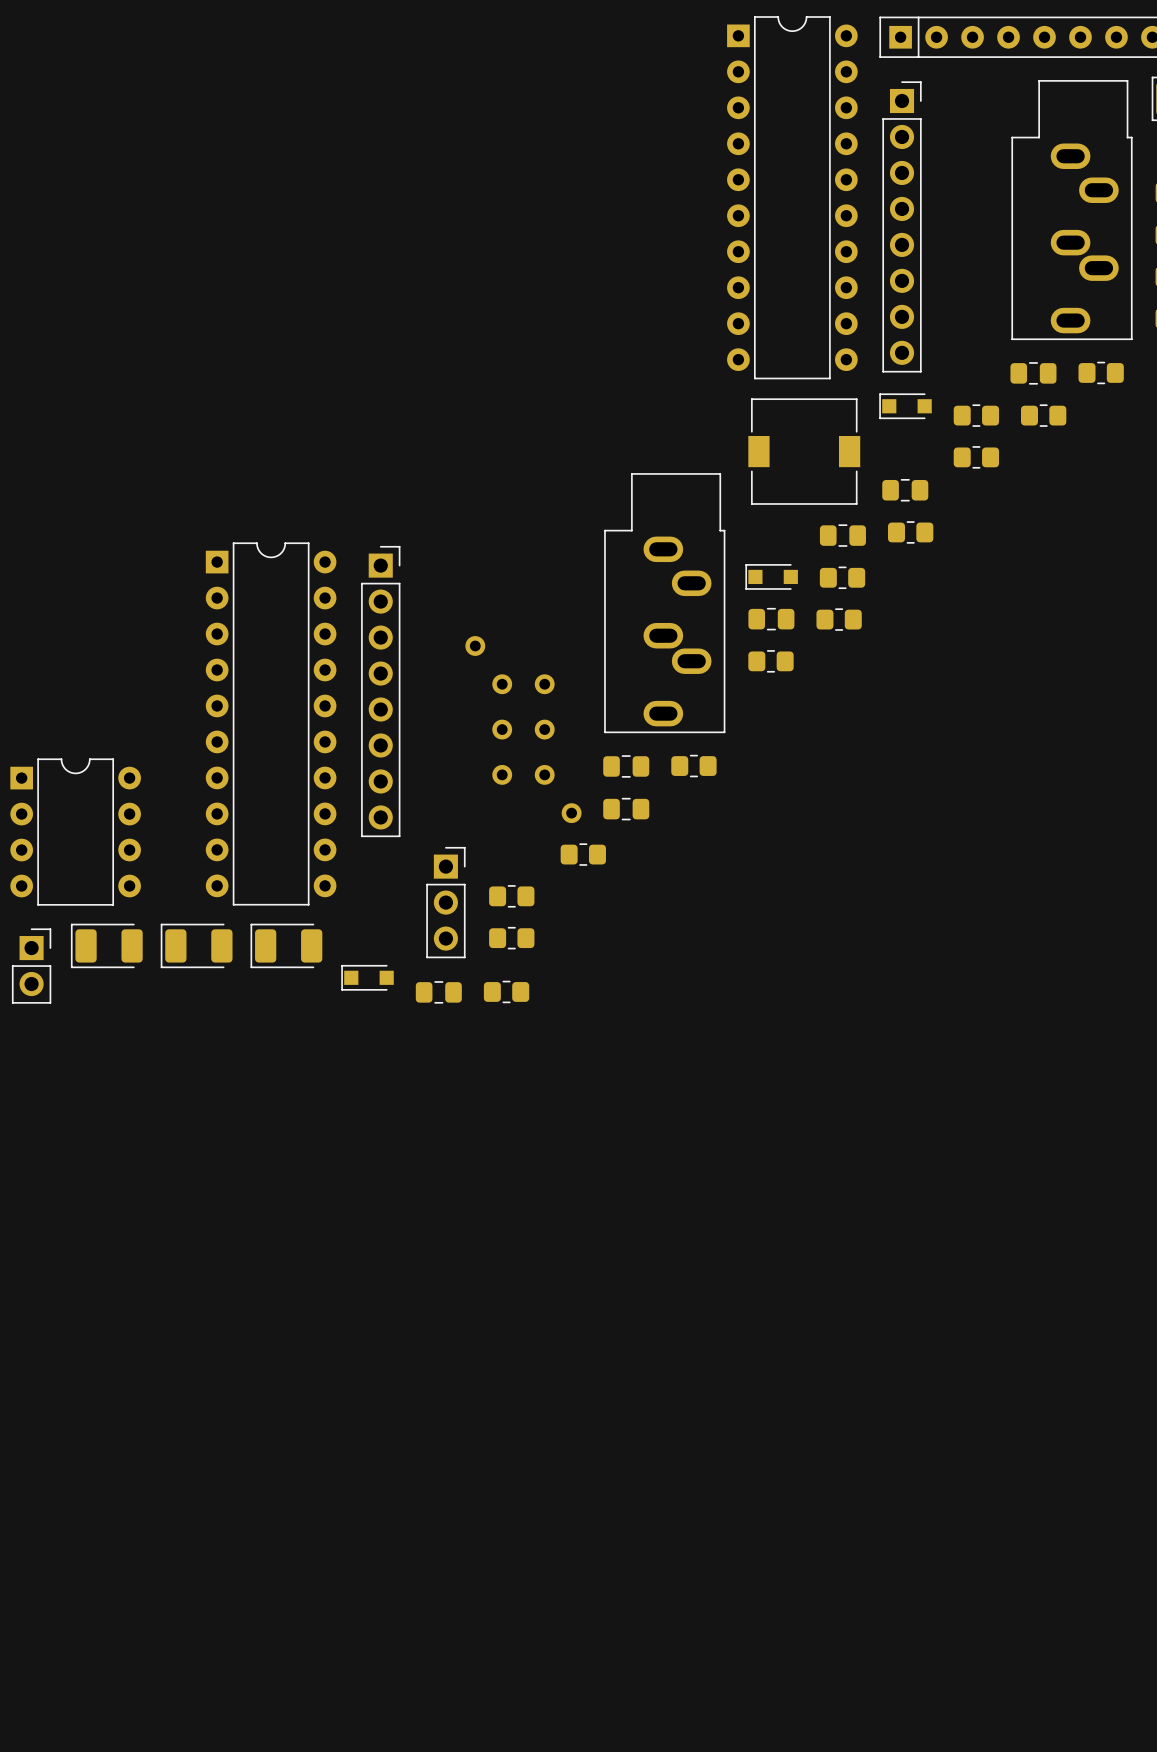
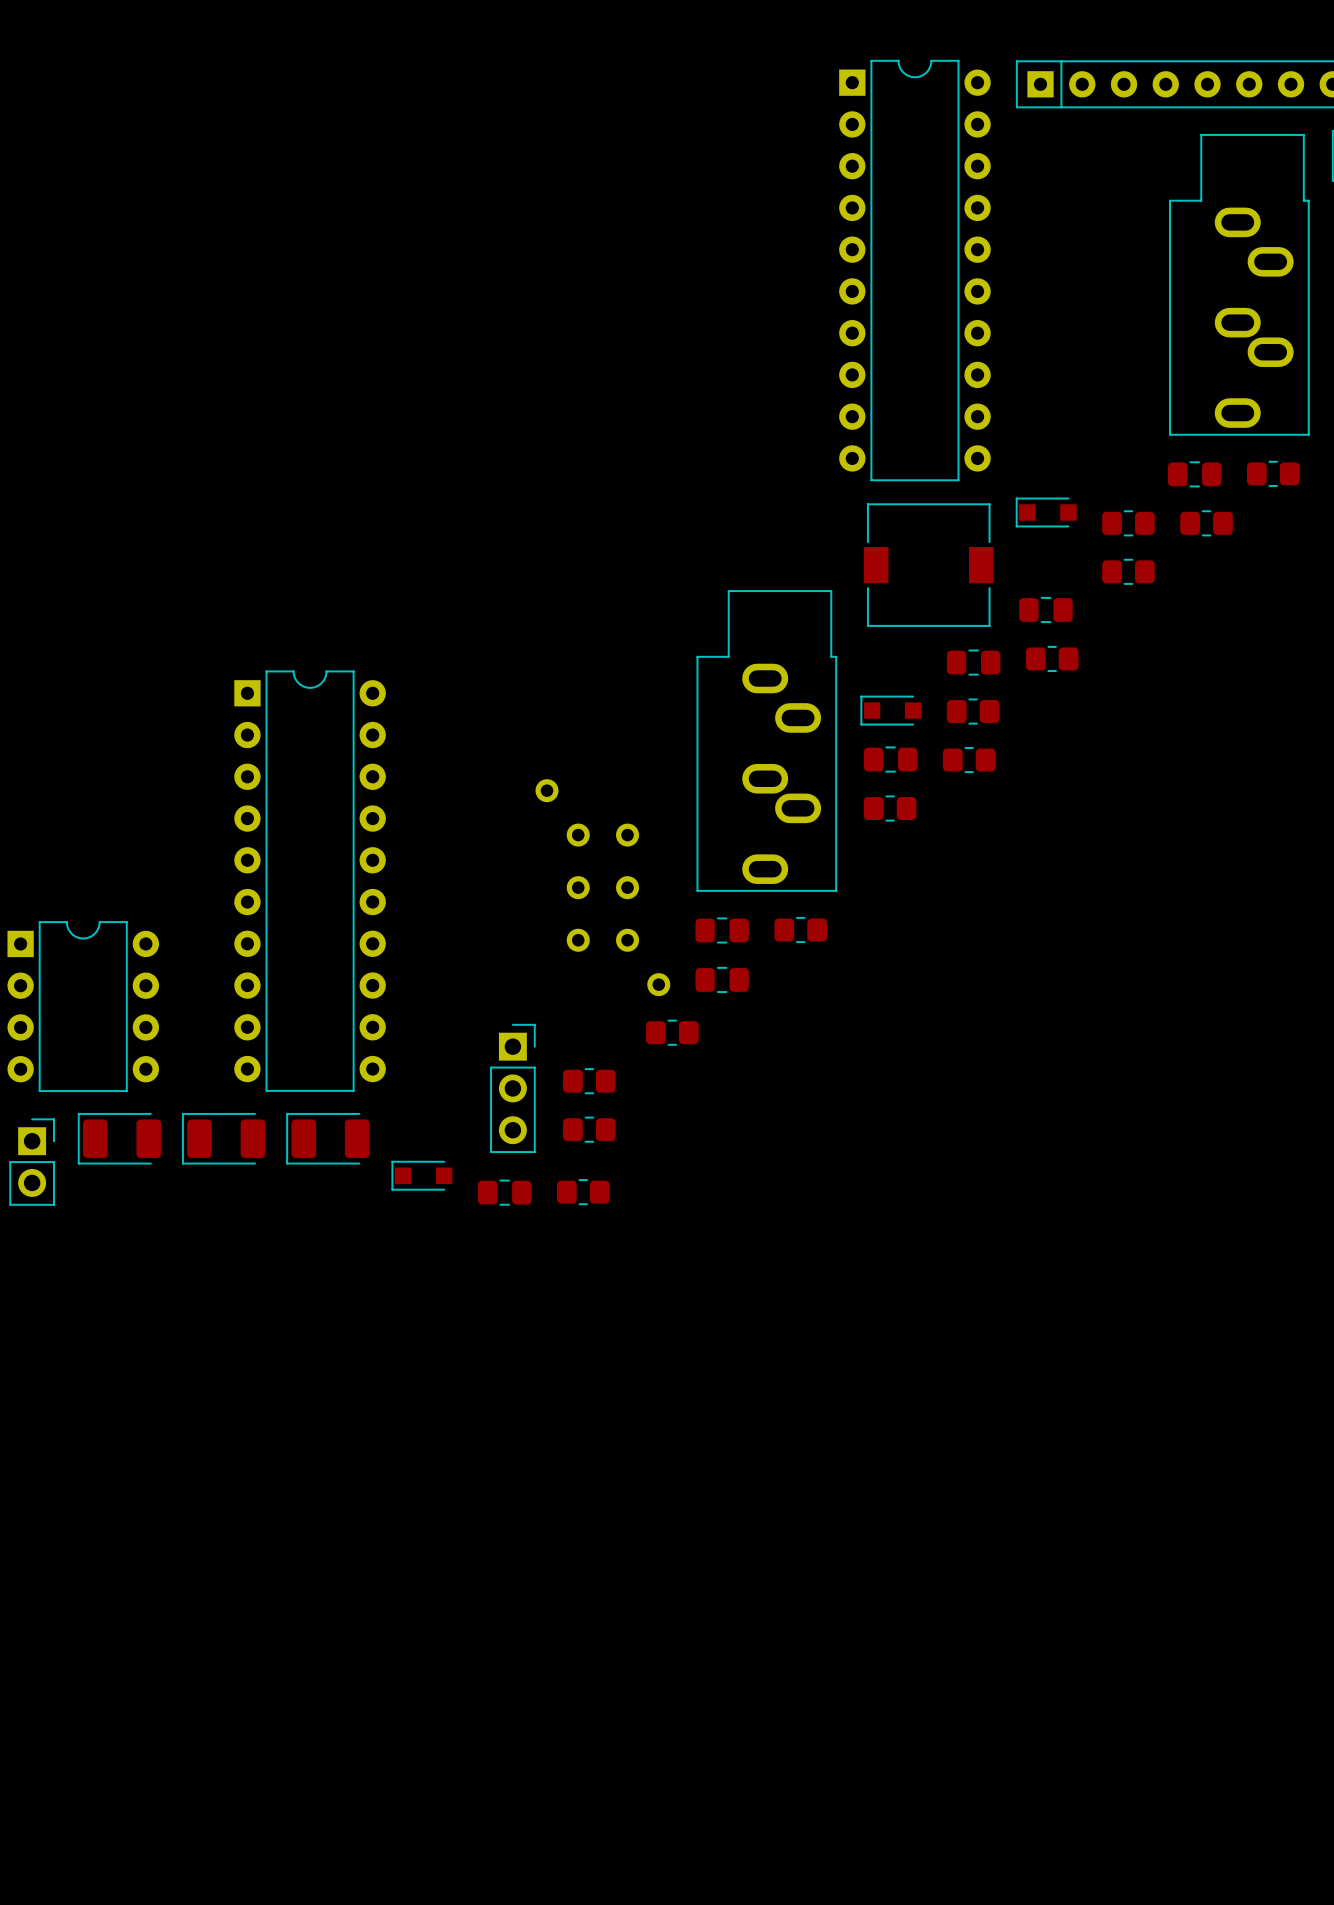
part: (902, 226) -> none
part: (380, 691) -> none

